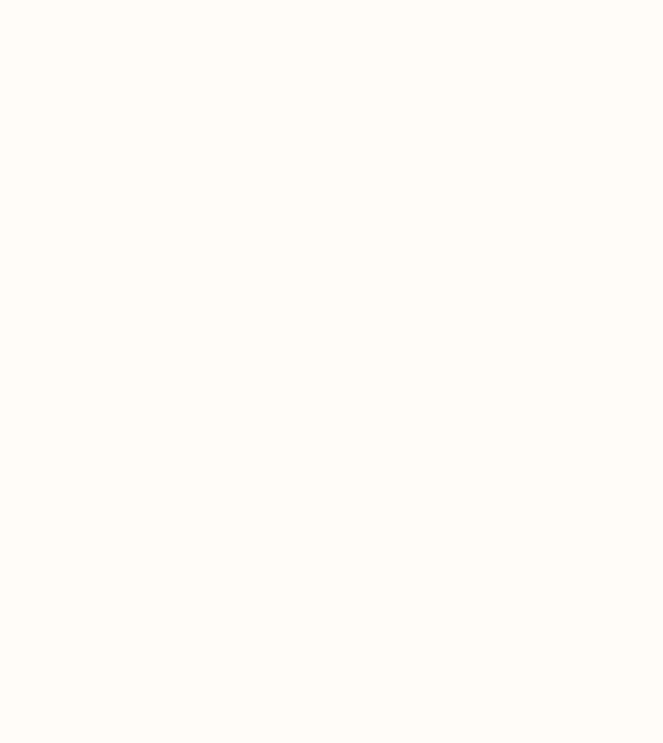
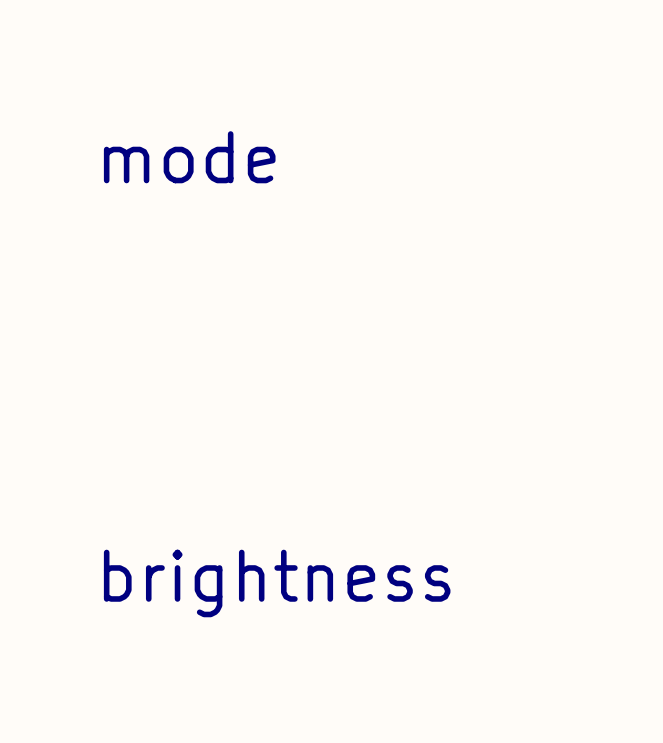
text: none -> mode (189, 157)
text: none -> brightness (277, 583)

